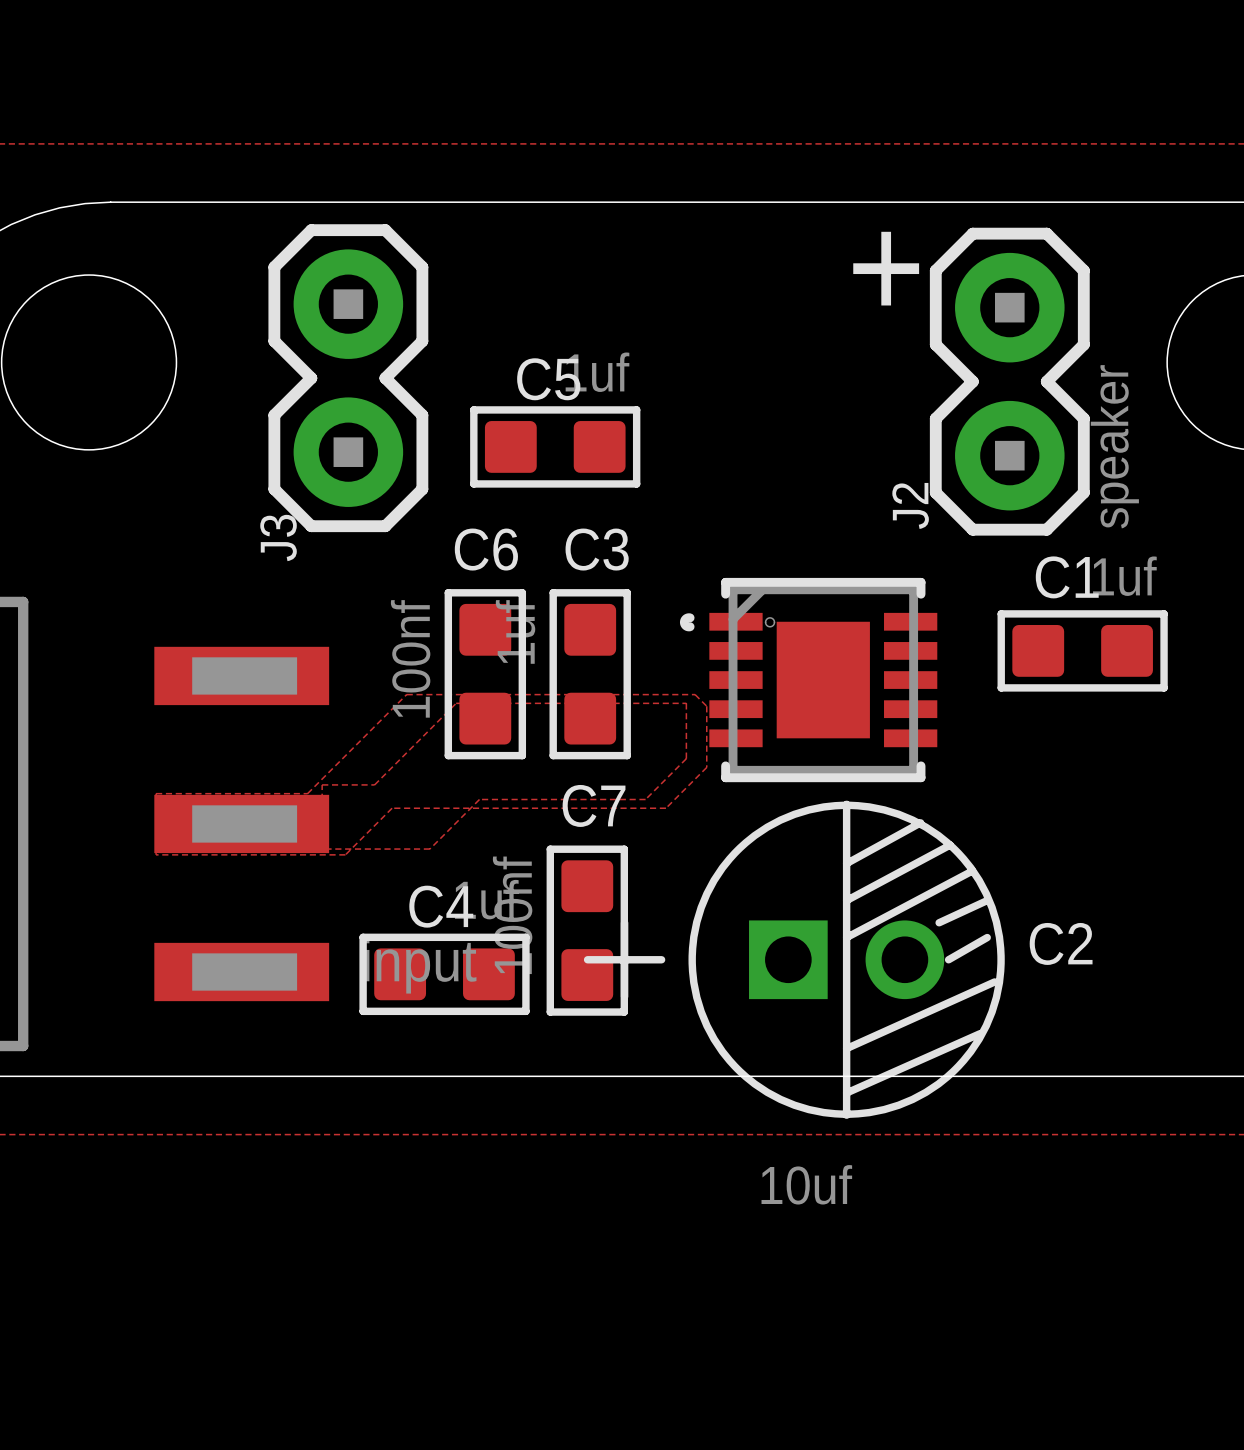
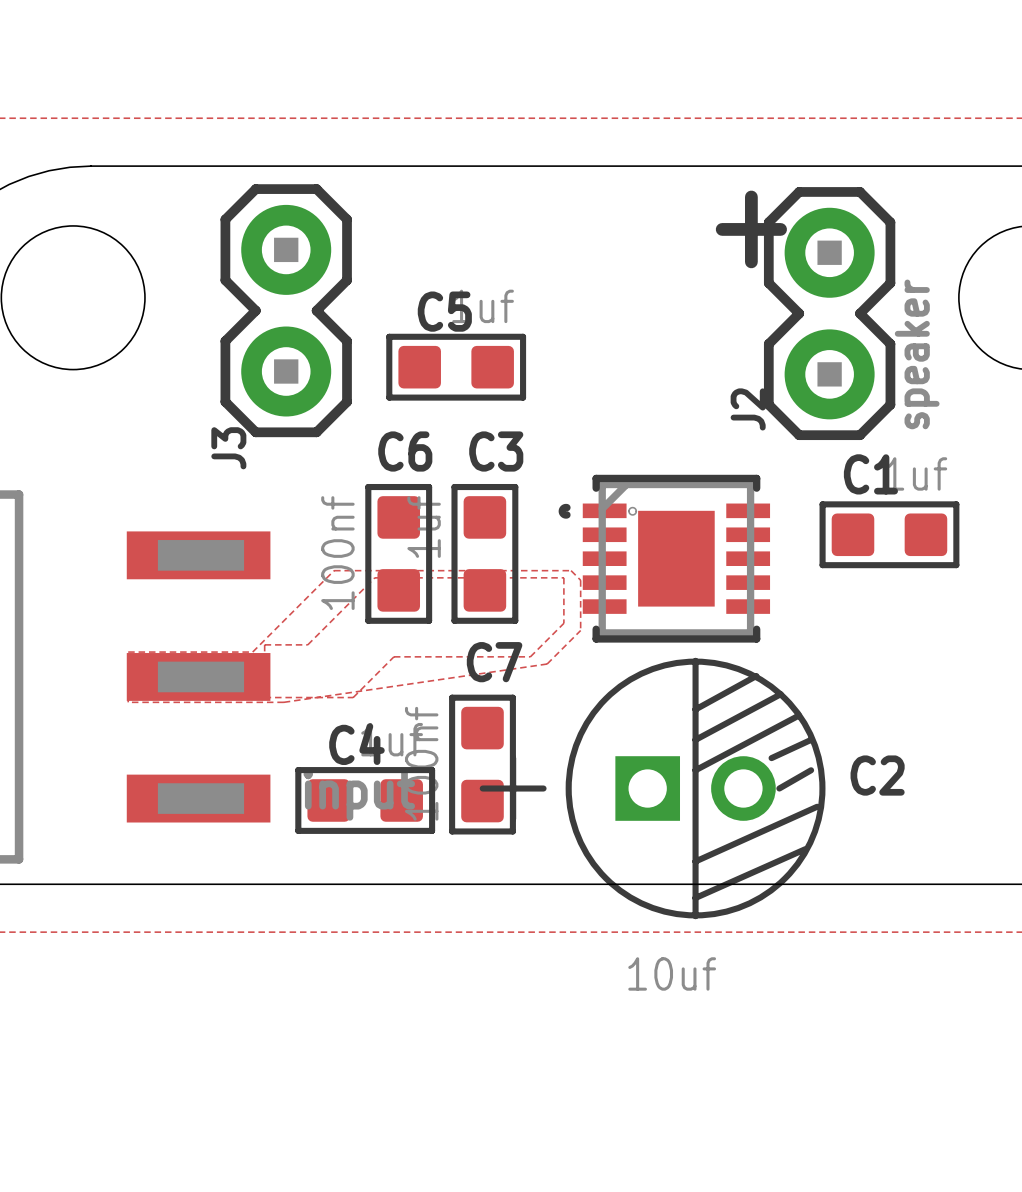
zone outline: (665, 808) (392, 808) (345, 854) -> (547, 664) (283, 702)

